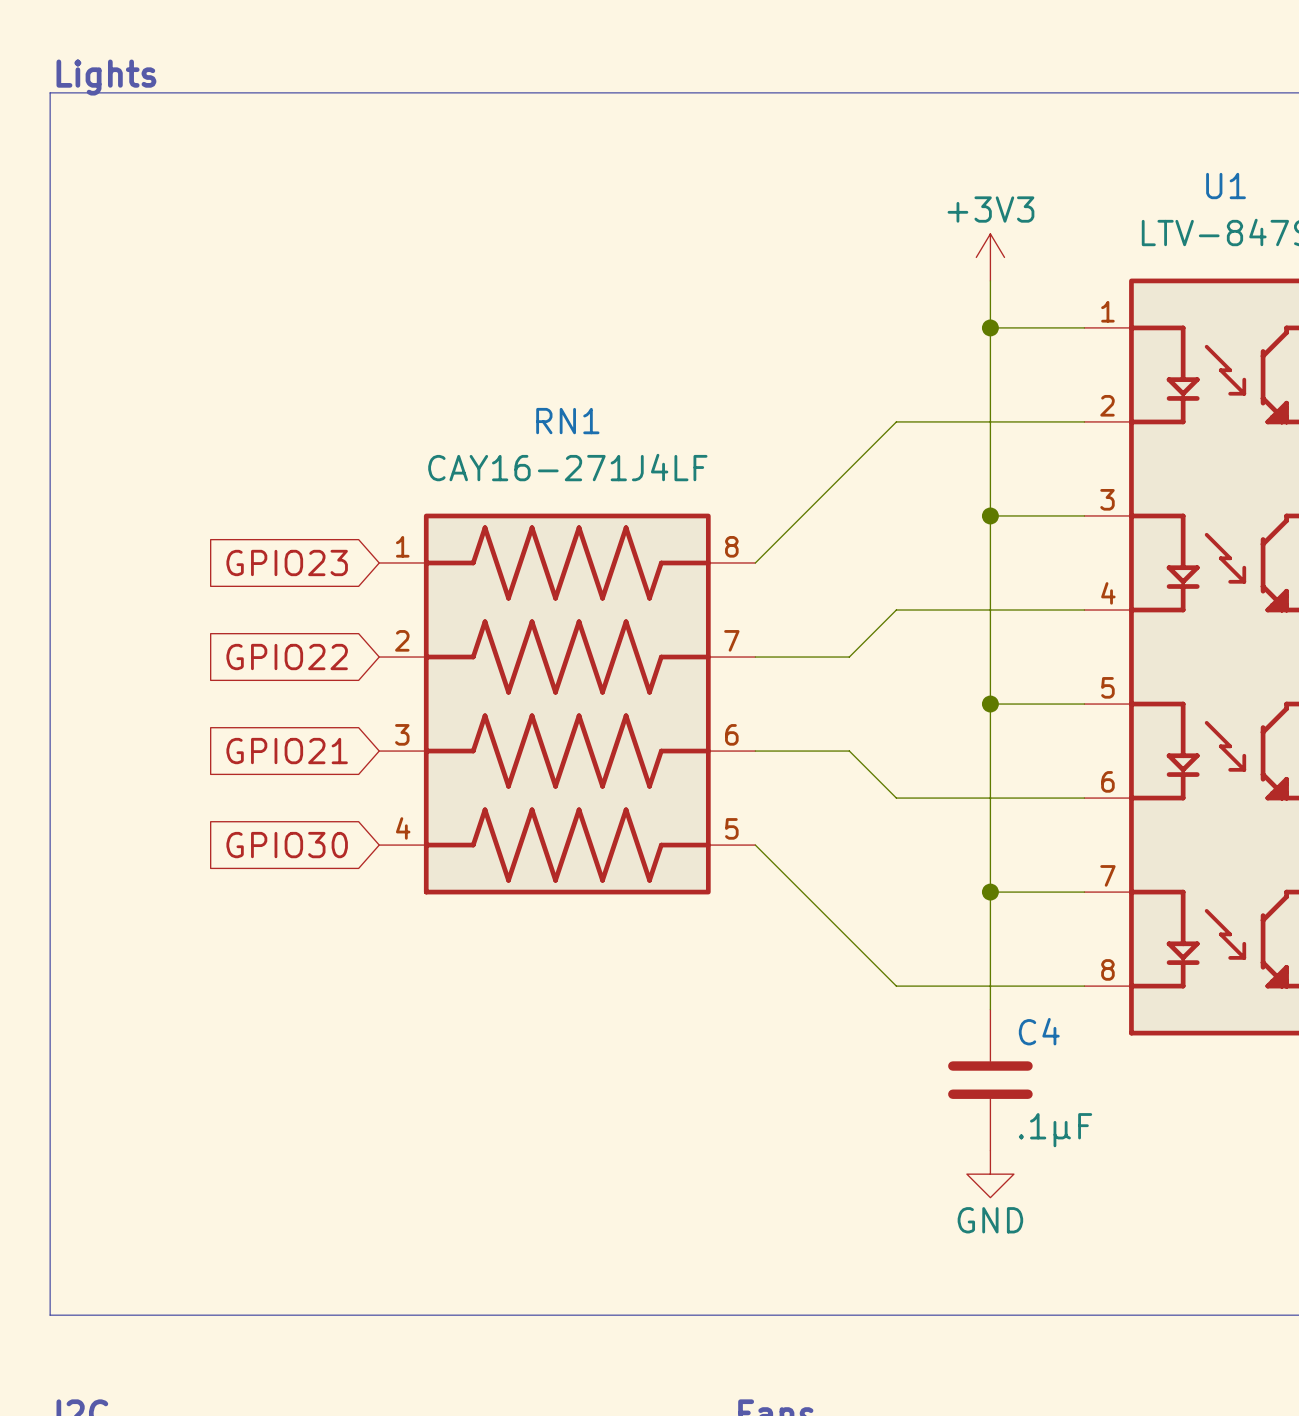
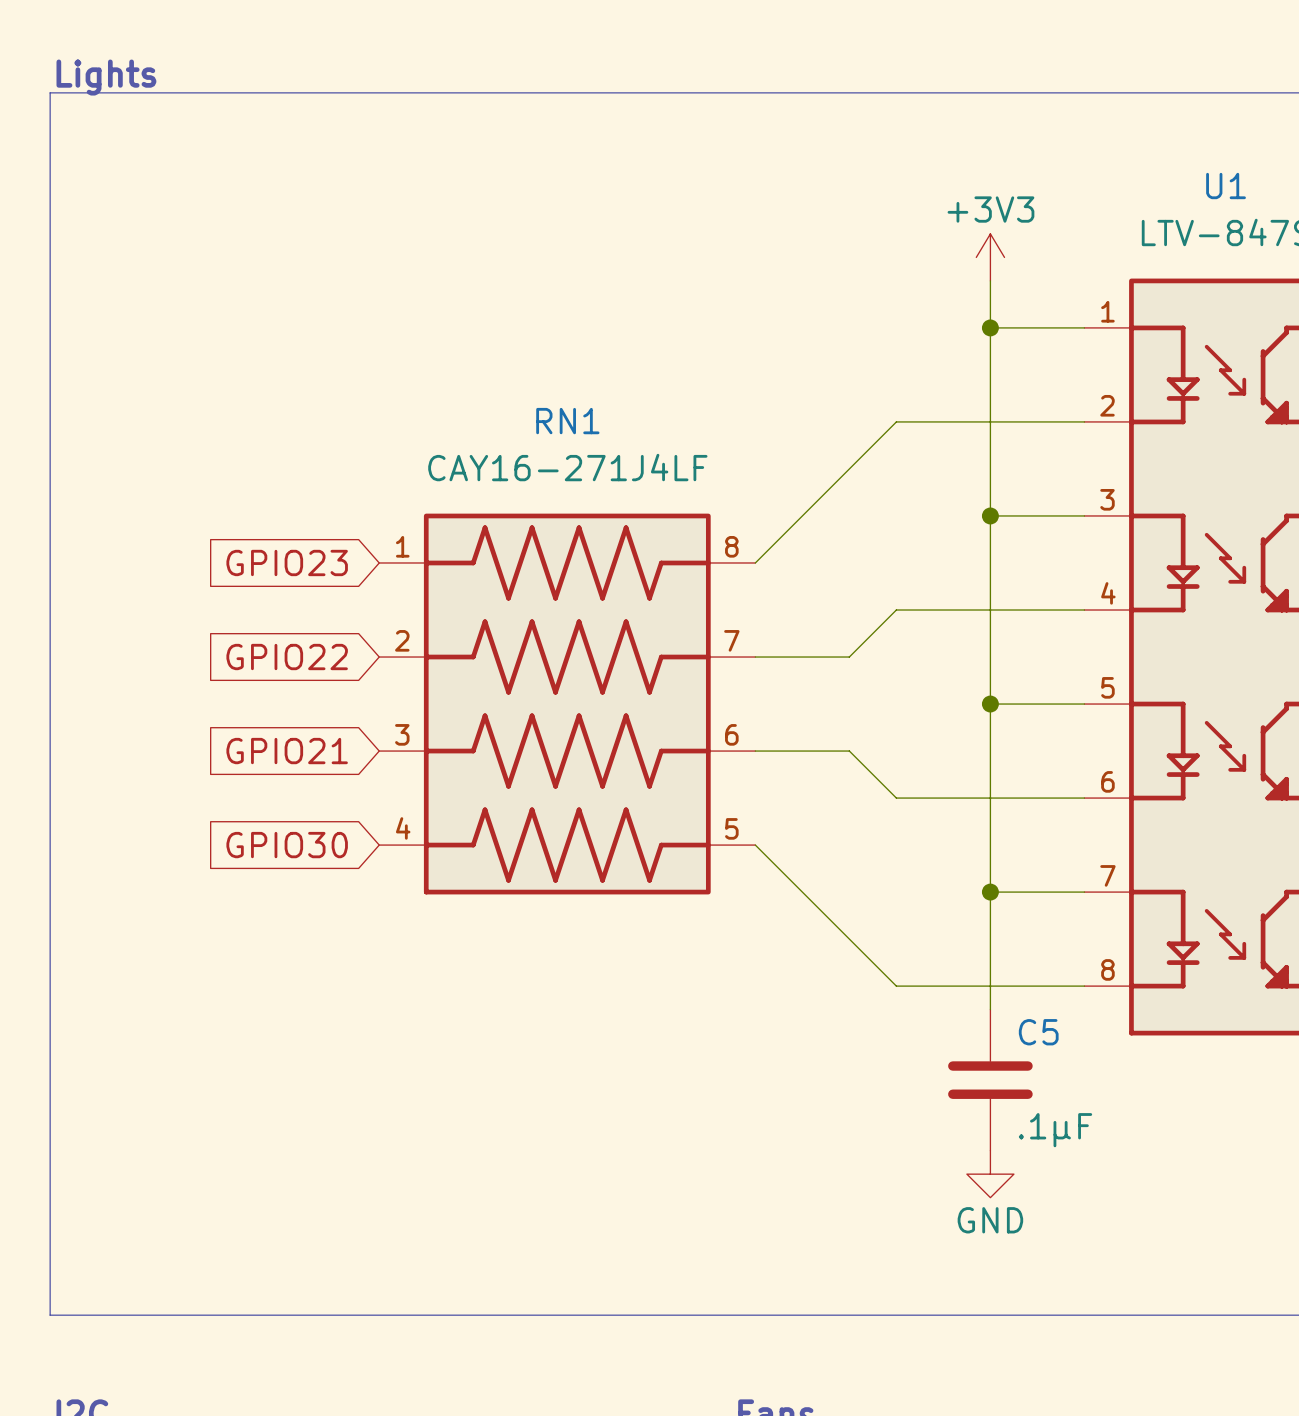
C4 name: C4 (1039, 1031) -> C5 (1038, 1032)

